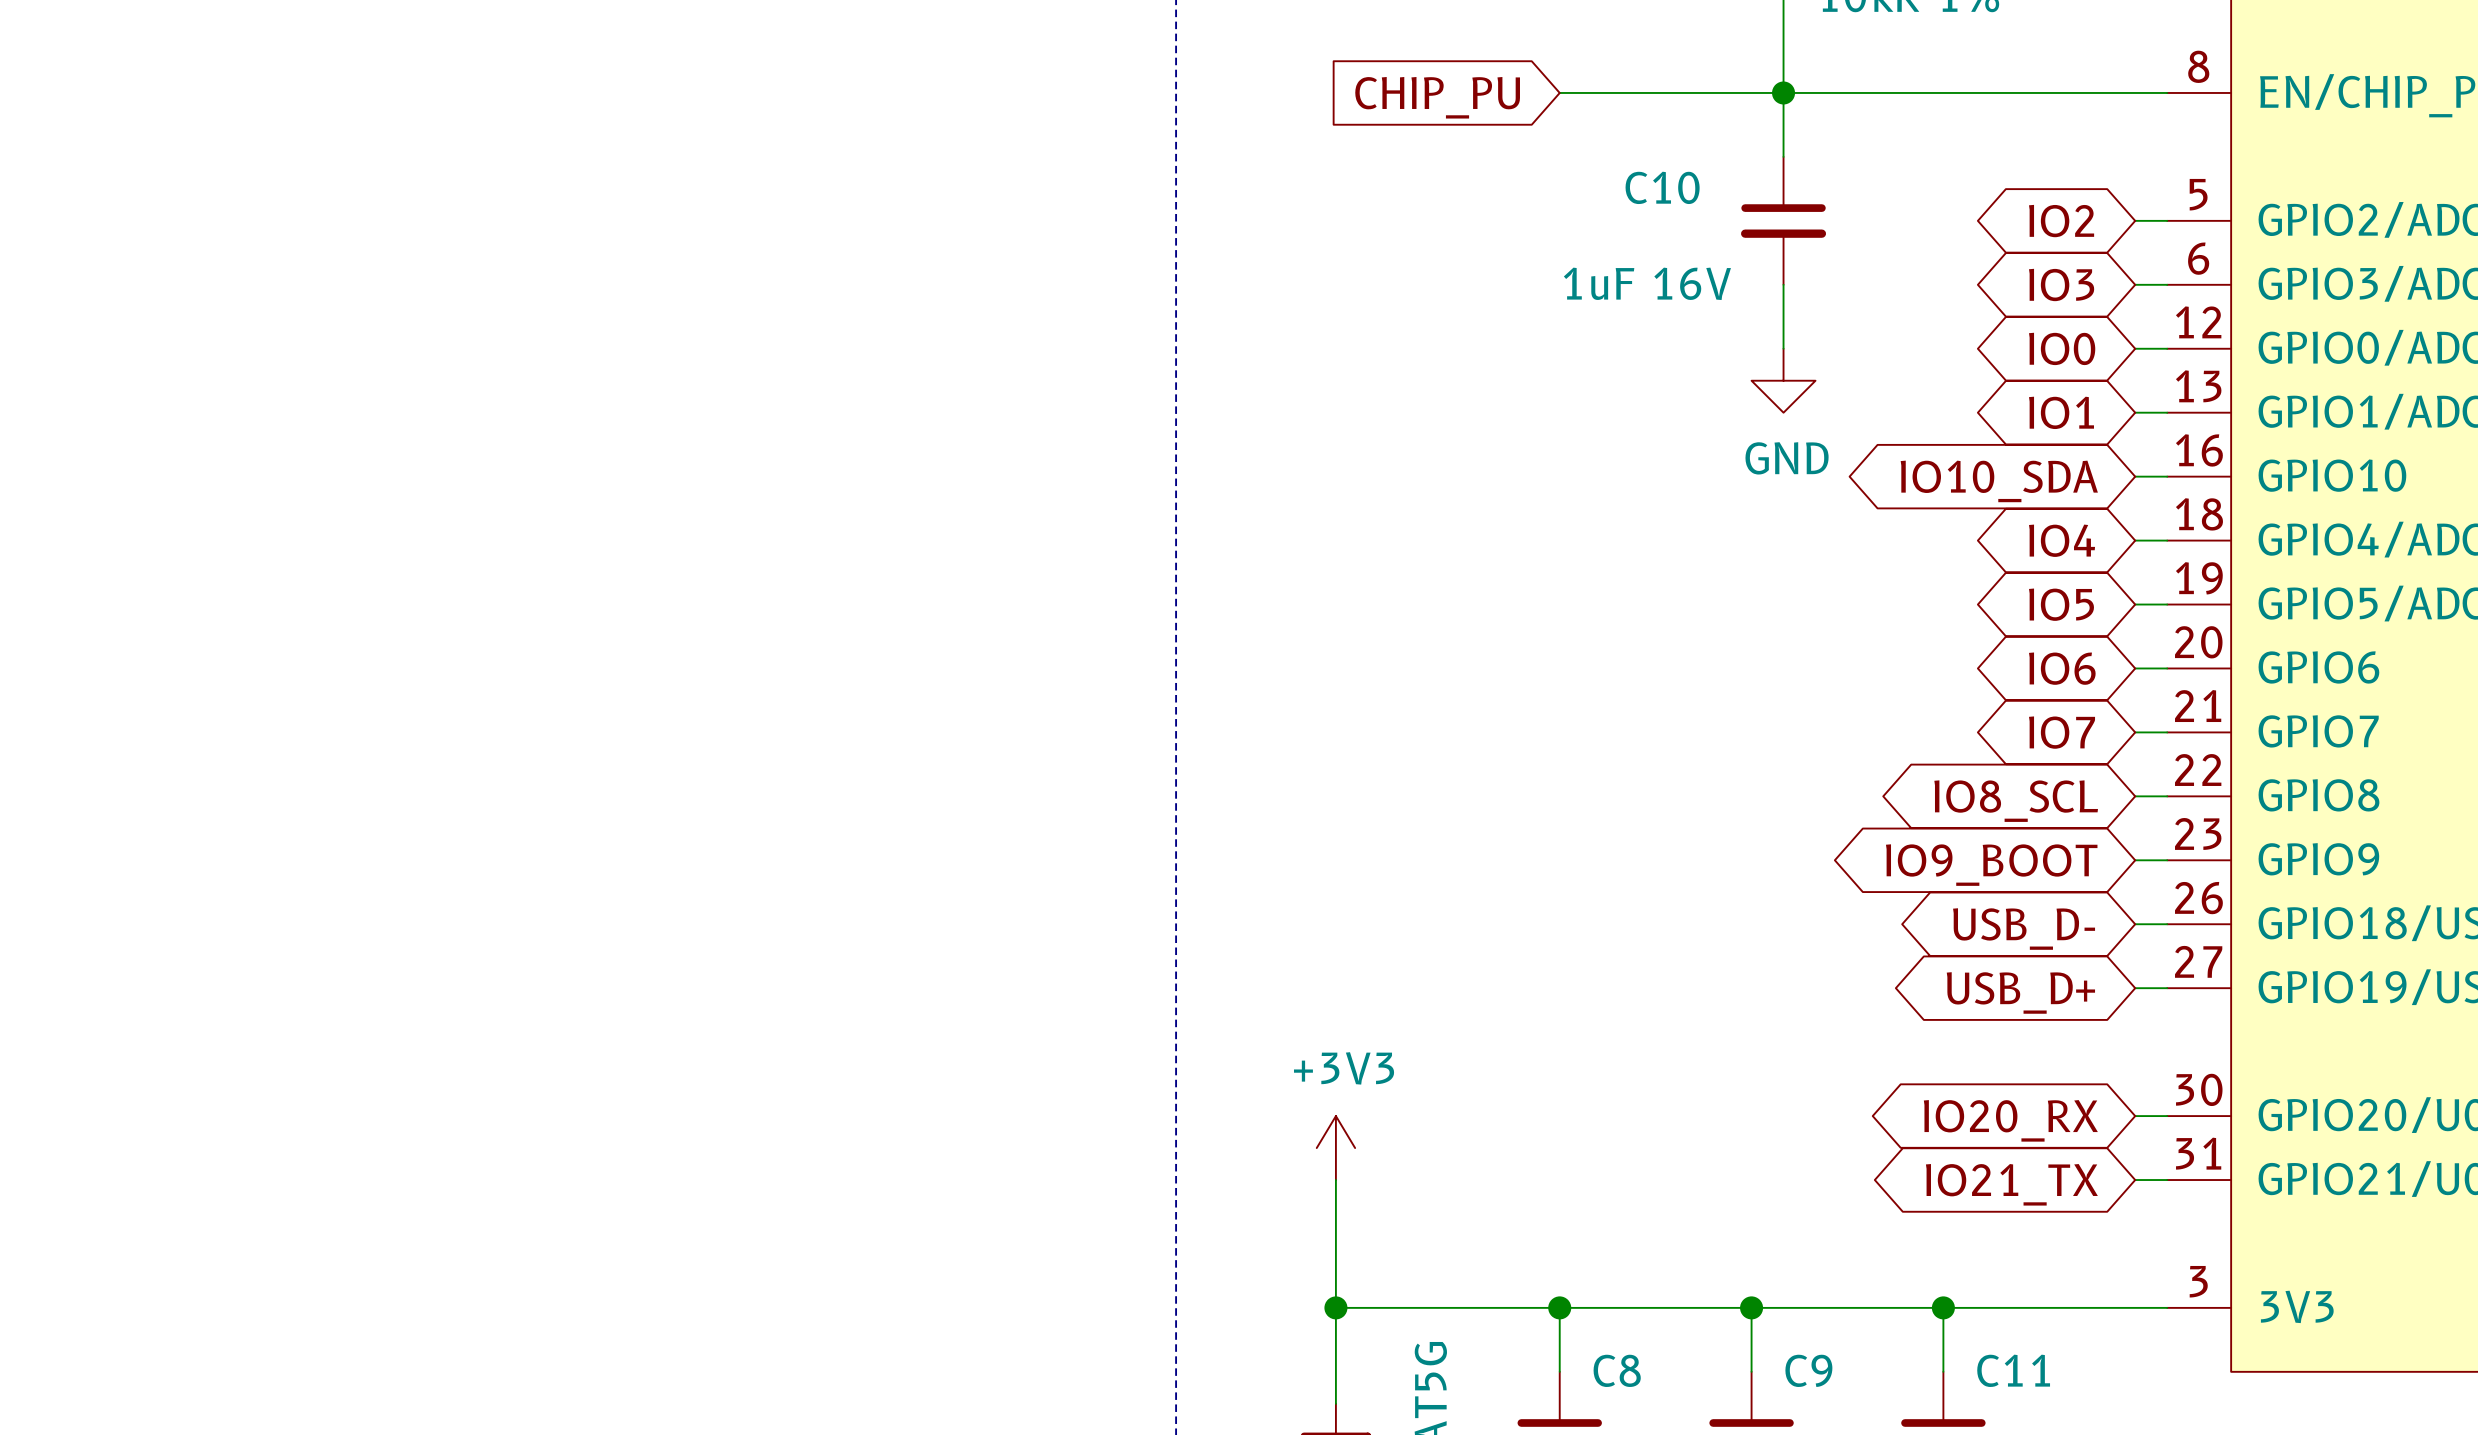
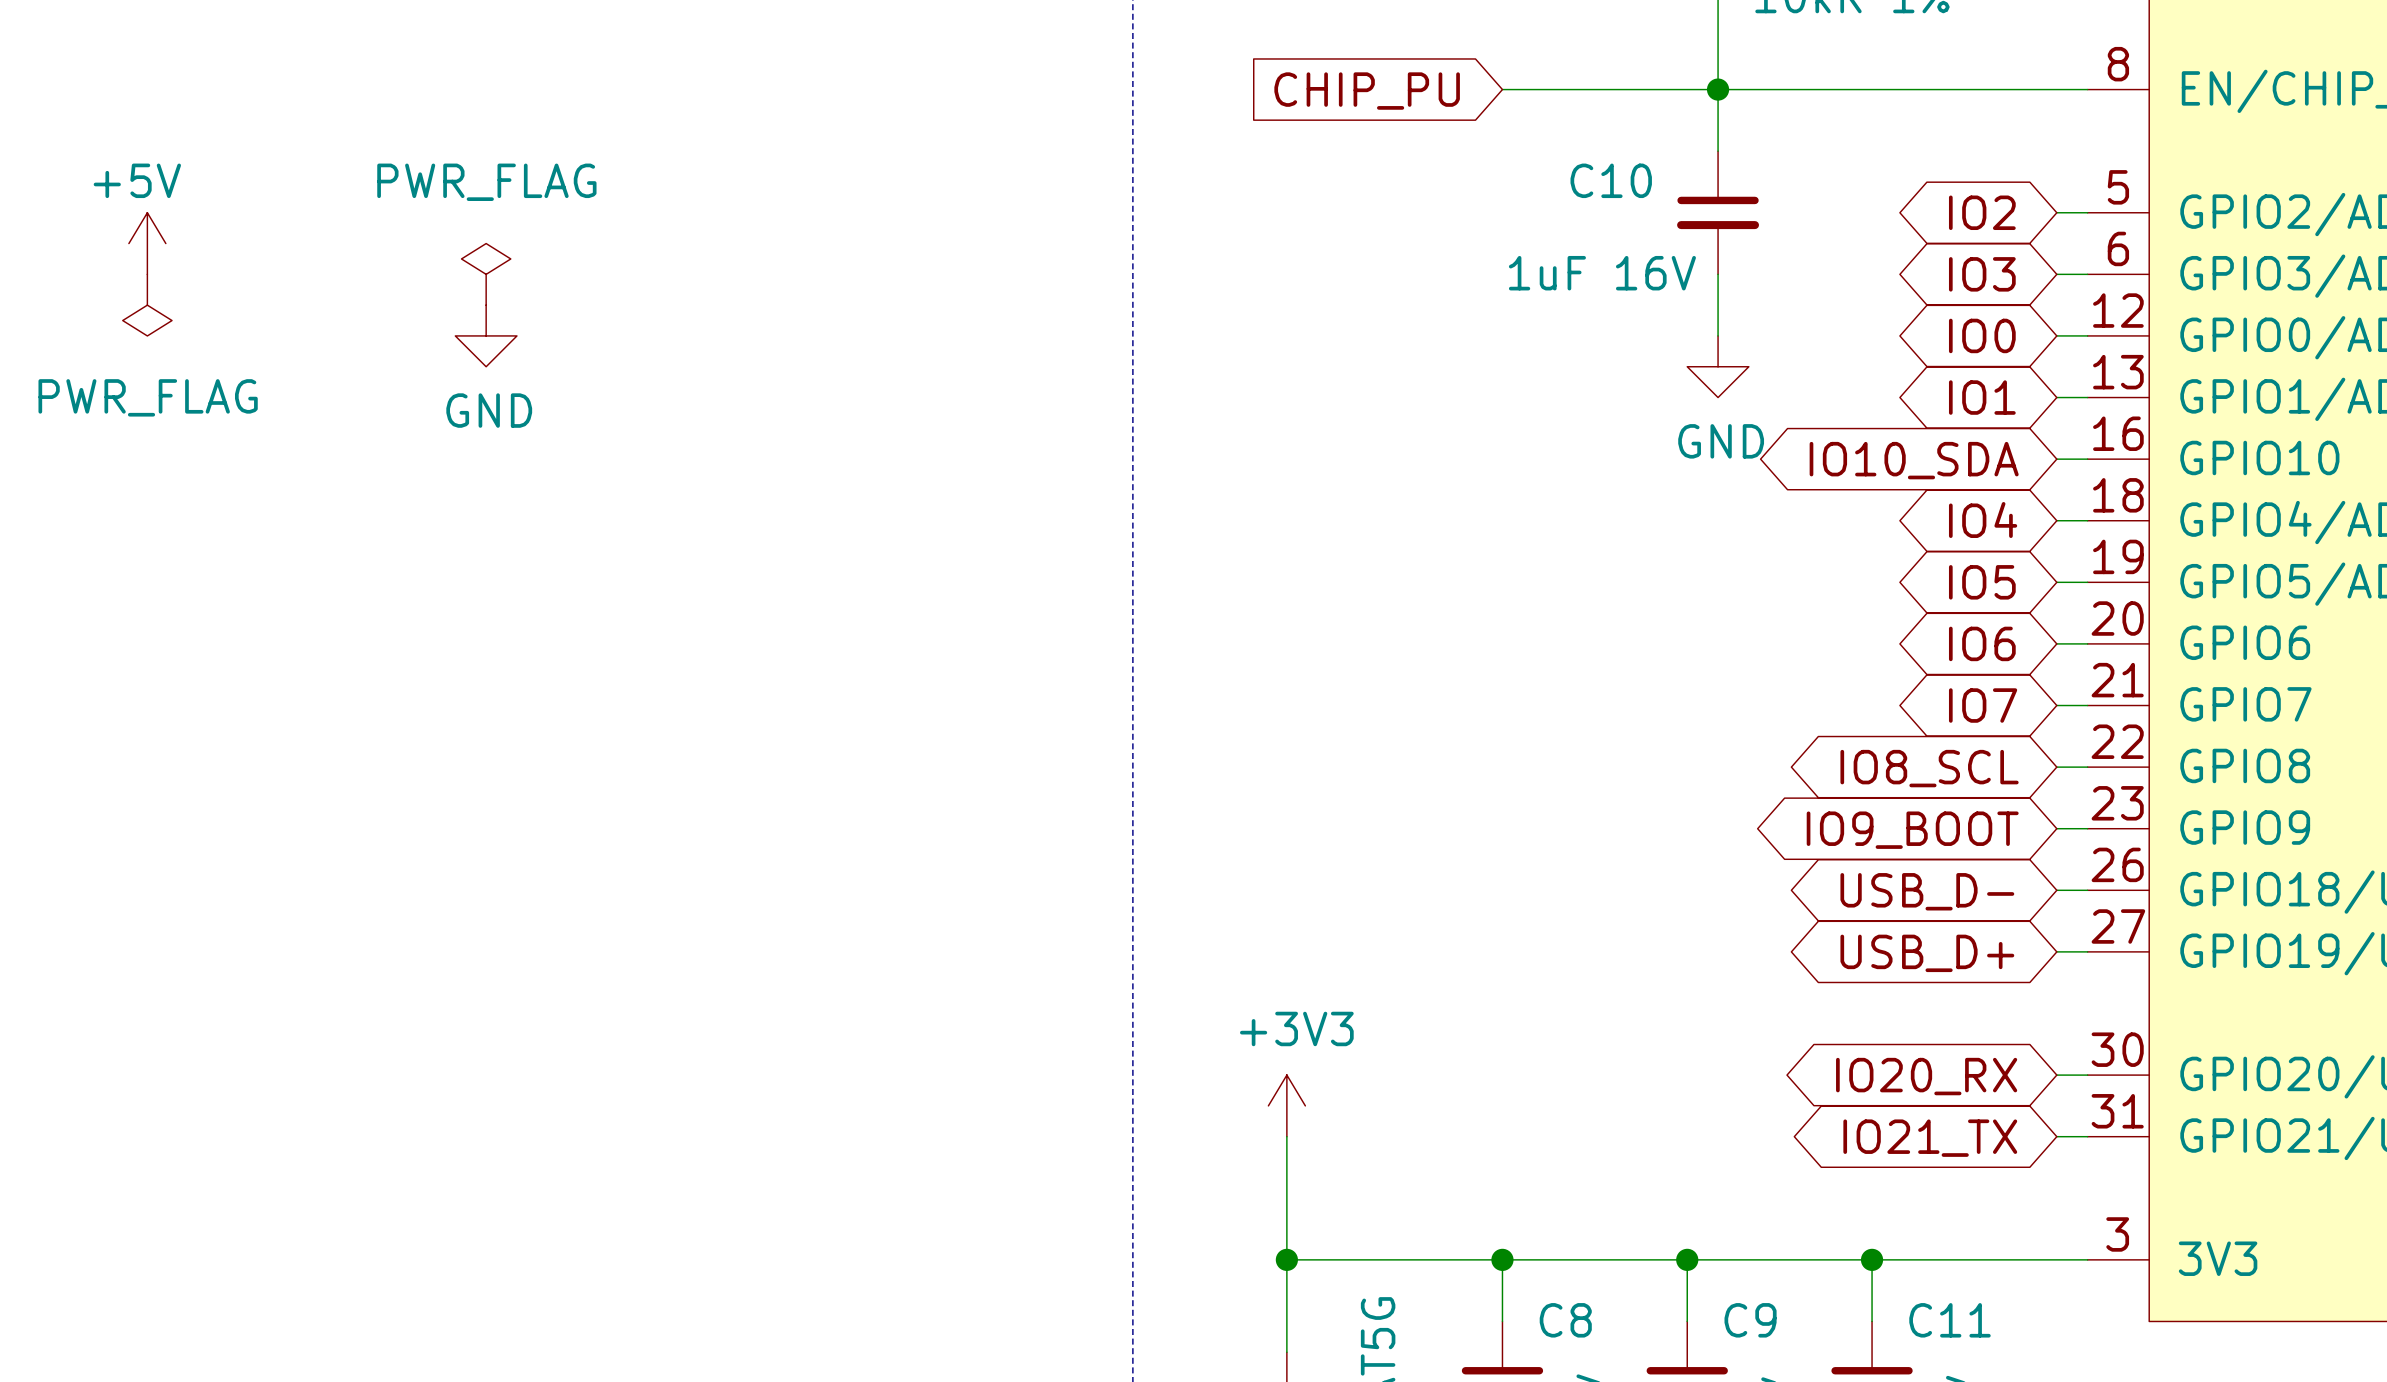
power symbol: none -> +5V (147, 243)
power symbol: none -> PWR_FLAG (486, 274)
power symbol: none -> PWR_FLAG (147, 305)
power symbol: none -> GND (486, 335)

